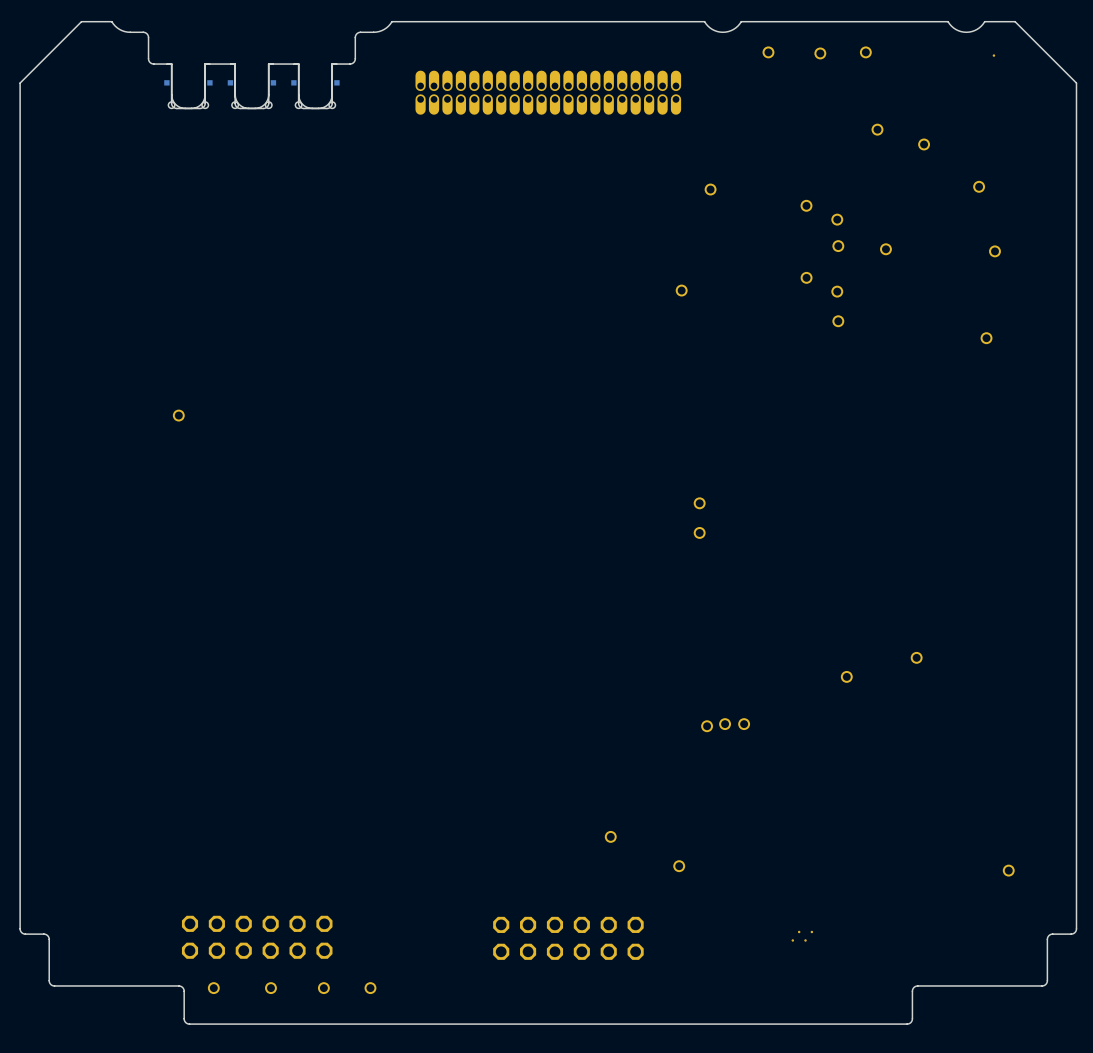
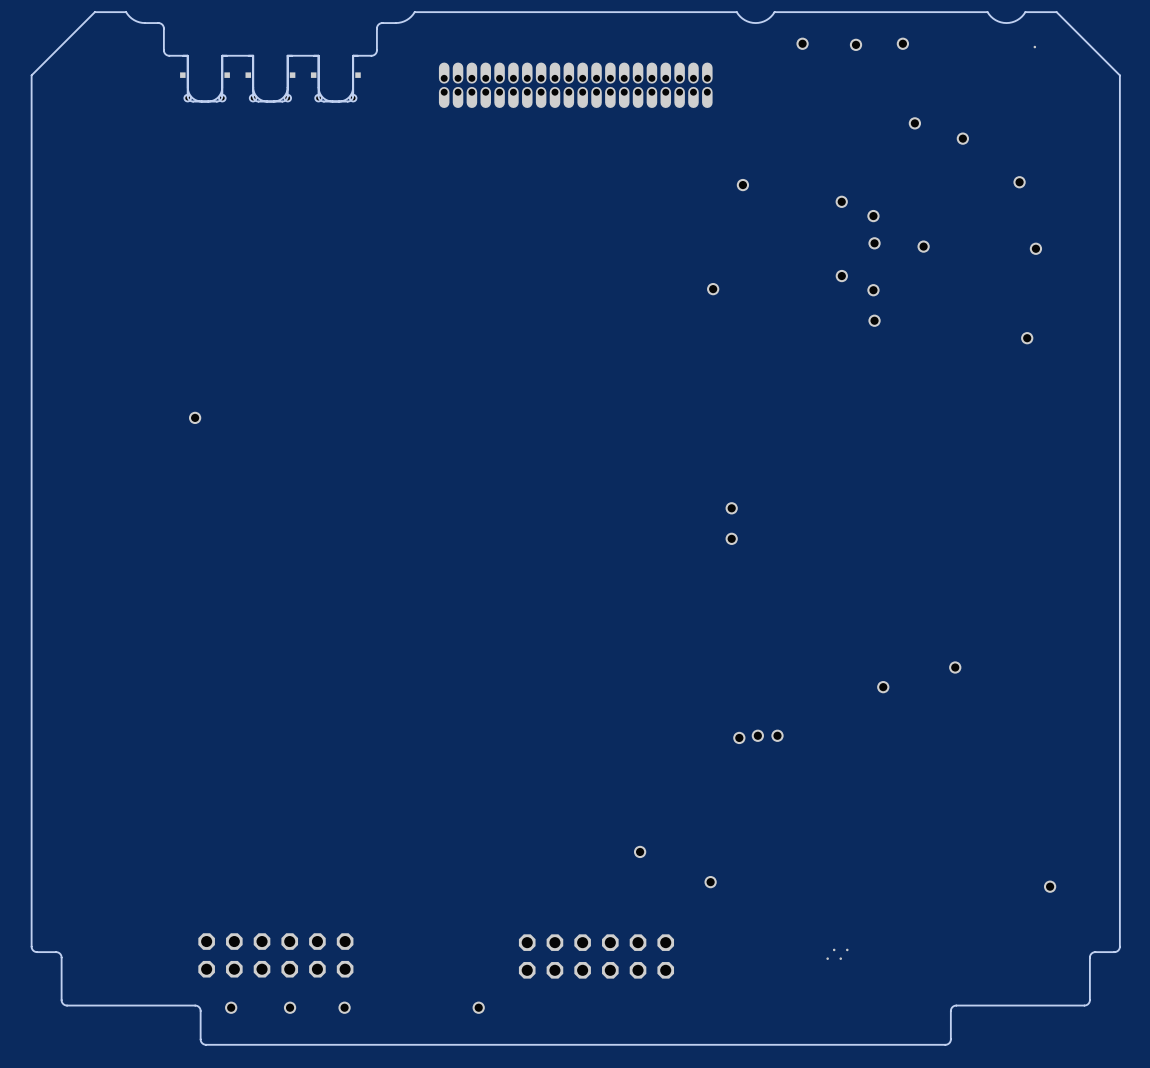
part position: (370, 988) -> (478, 1007)

